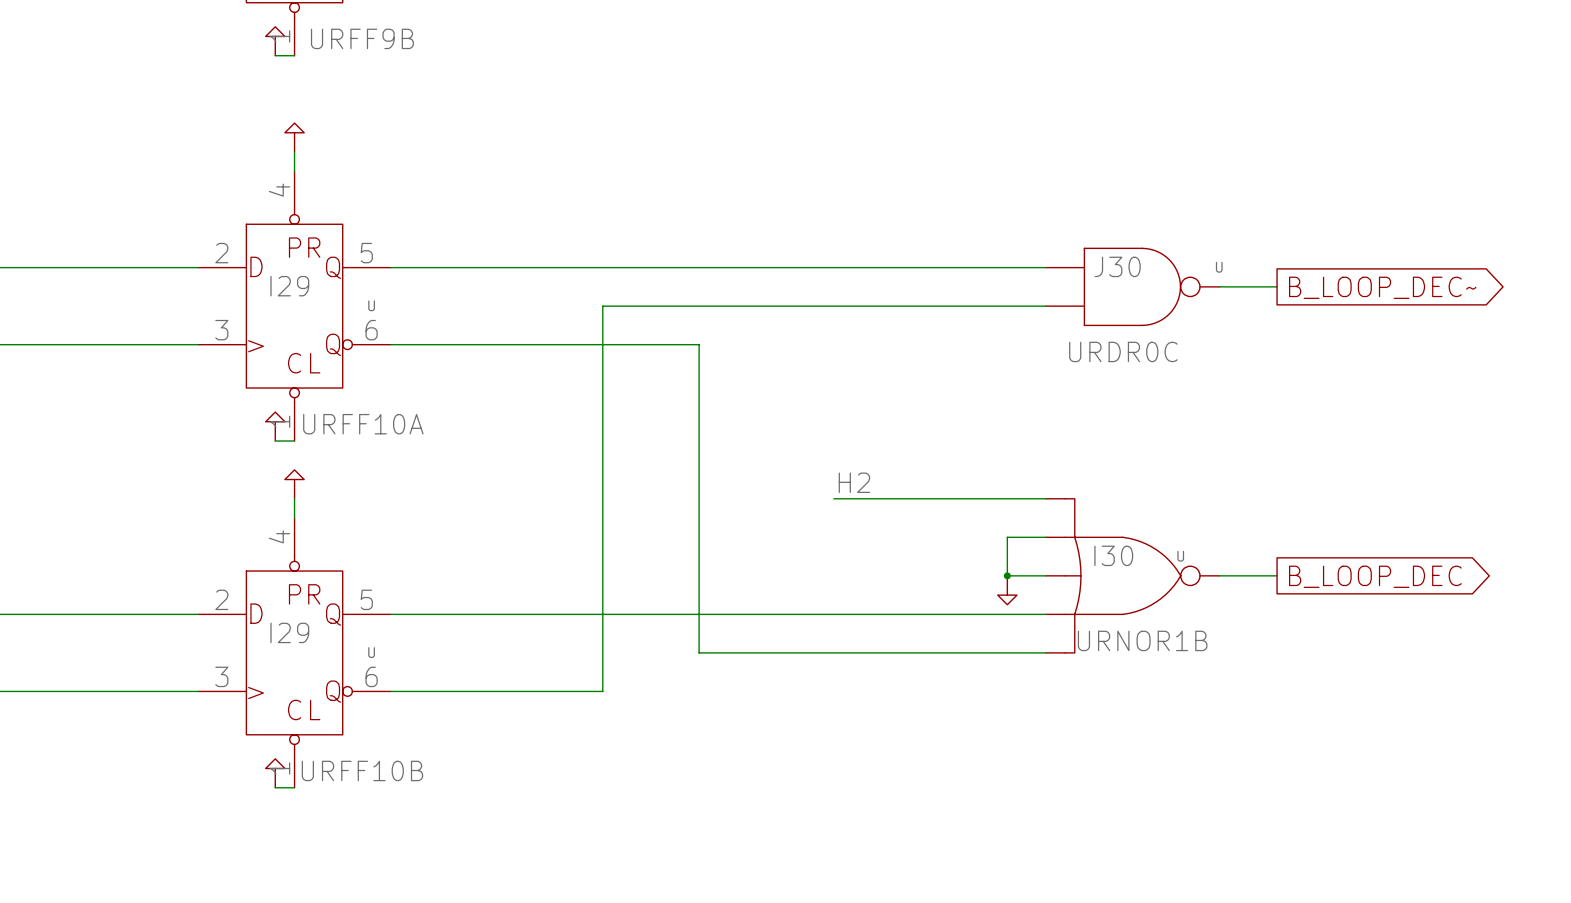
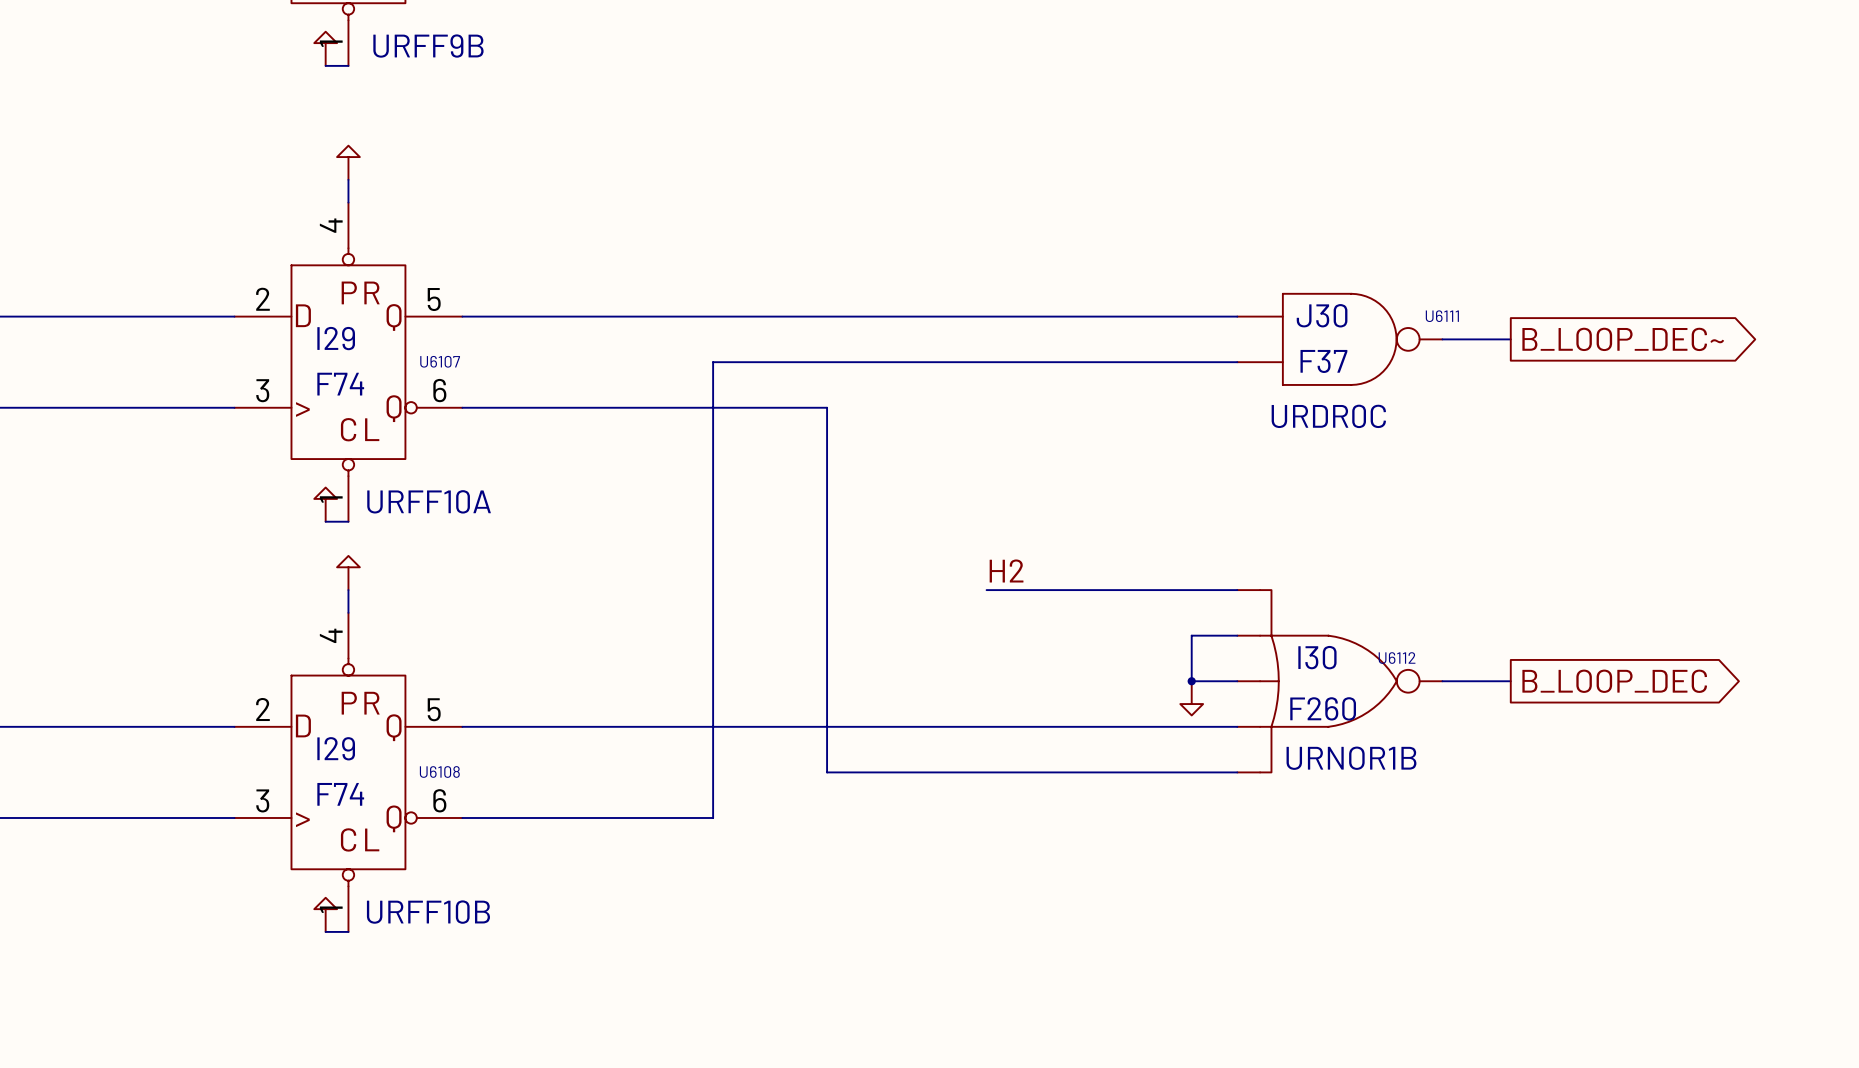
U name: U (1219, 267) -> U6111 (1442, 316)
U name: U (371, 305) -> U6107 (440, 361)
U value: none -> F37 (1323, 361)
U value: none -> F74 (340, 384)
U name: U (1180, 556) -> U6112 (1397, 658)
U value: none -> F260 (1323, 708)
U name: U (371, 652) -> U6108 (439, 771)
U value: none -> F74 (340, 794)

